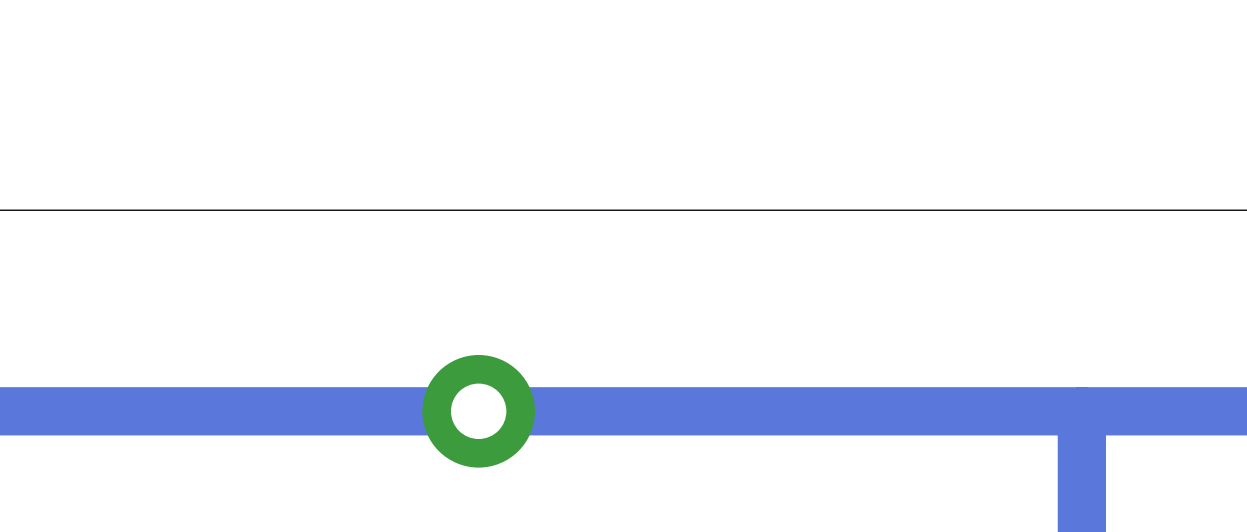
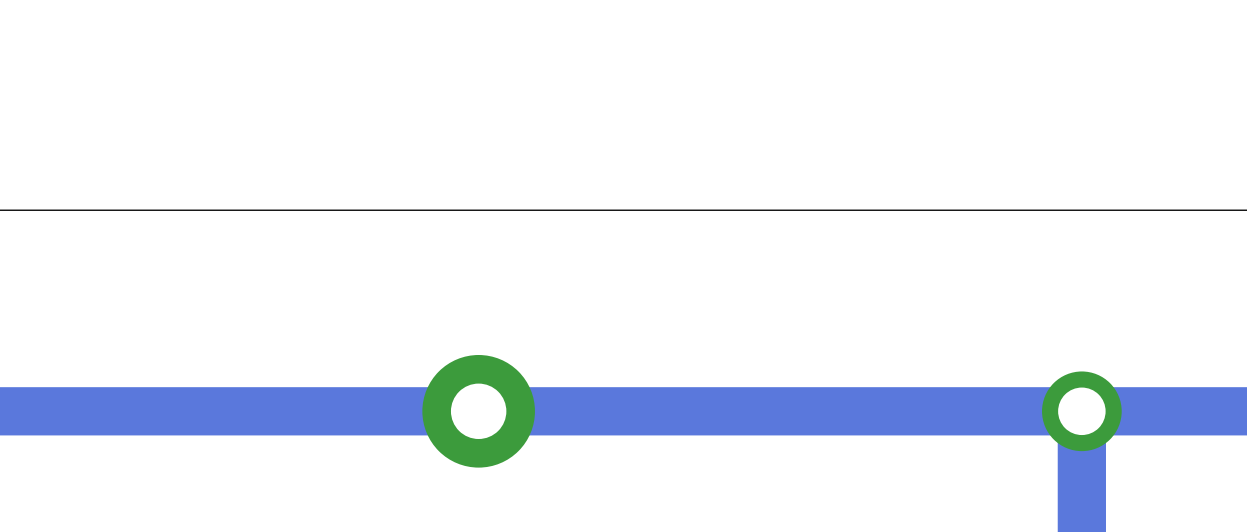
via: none -> (1081, 411)

